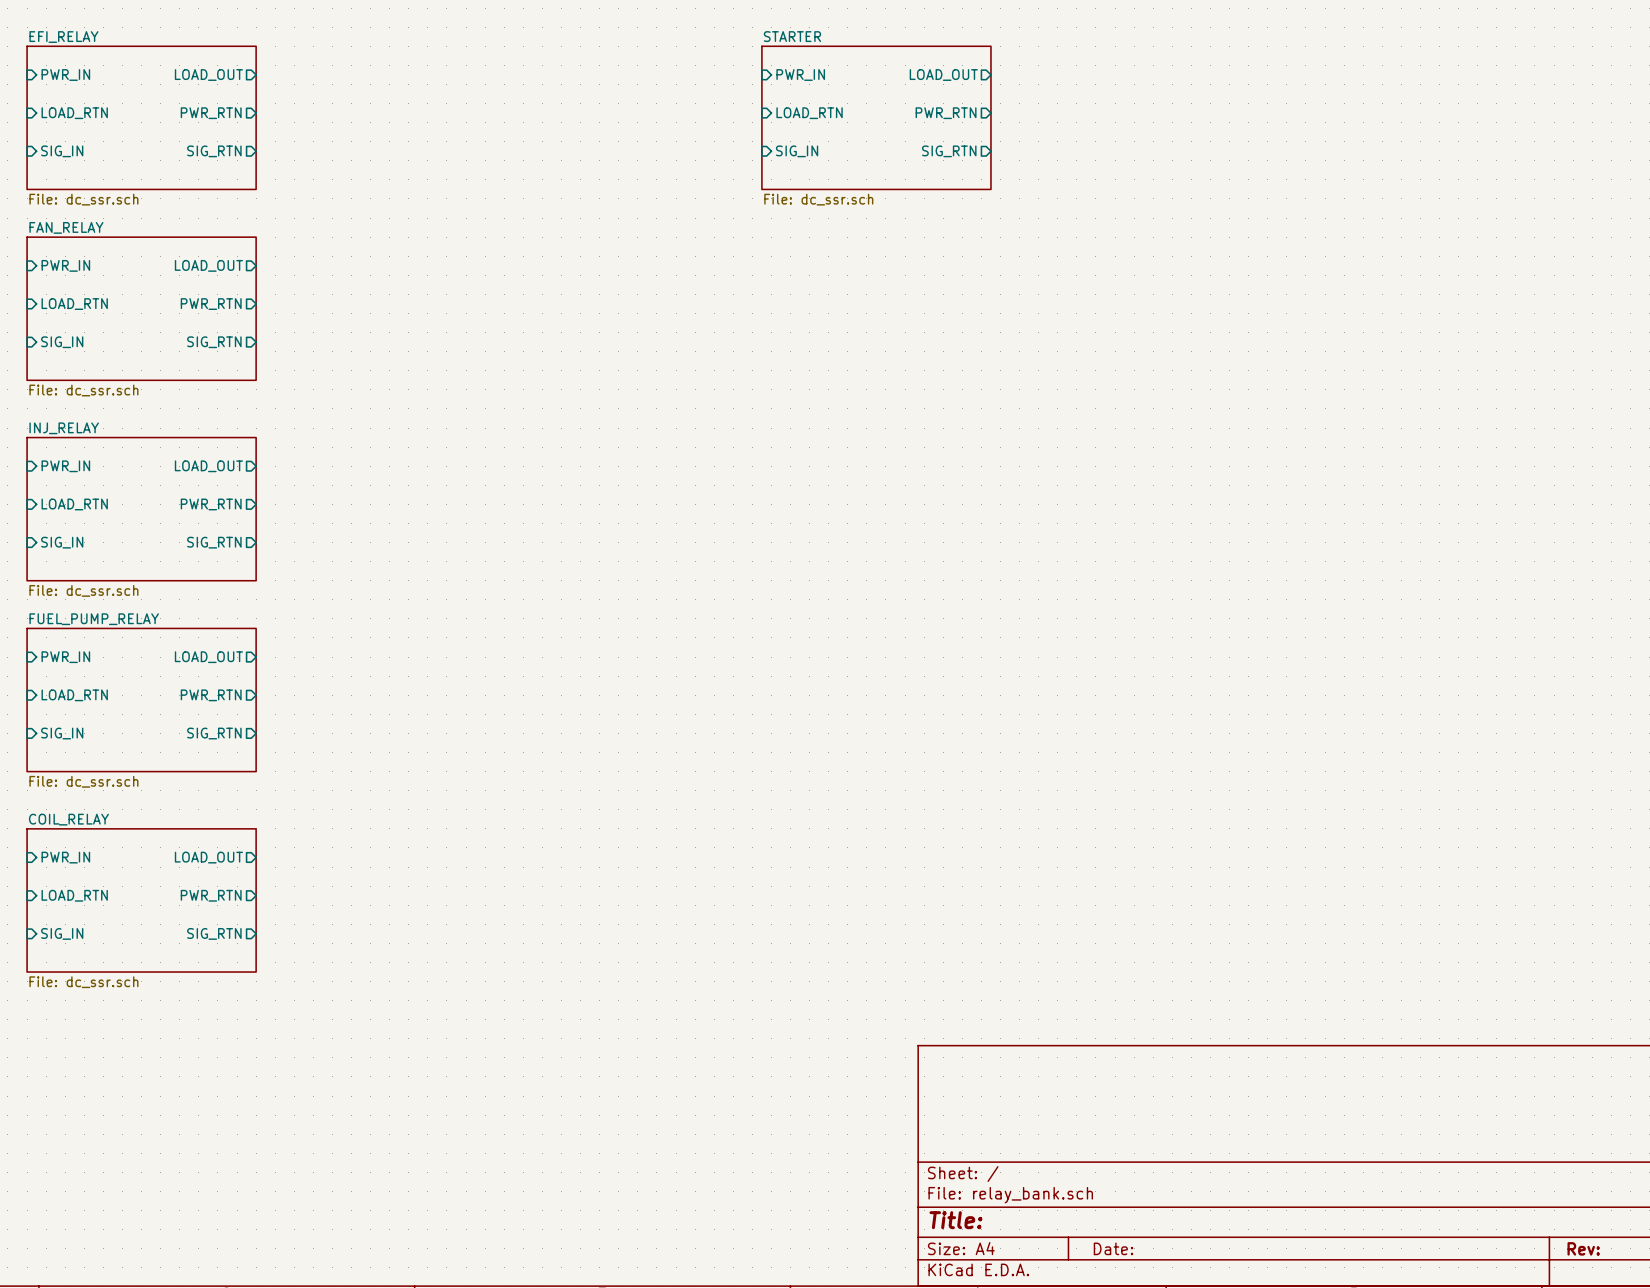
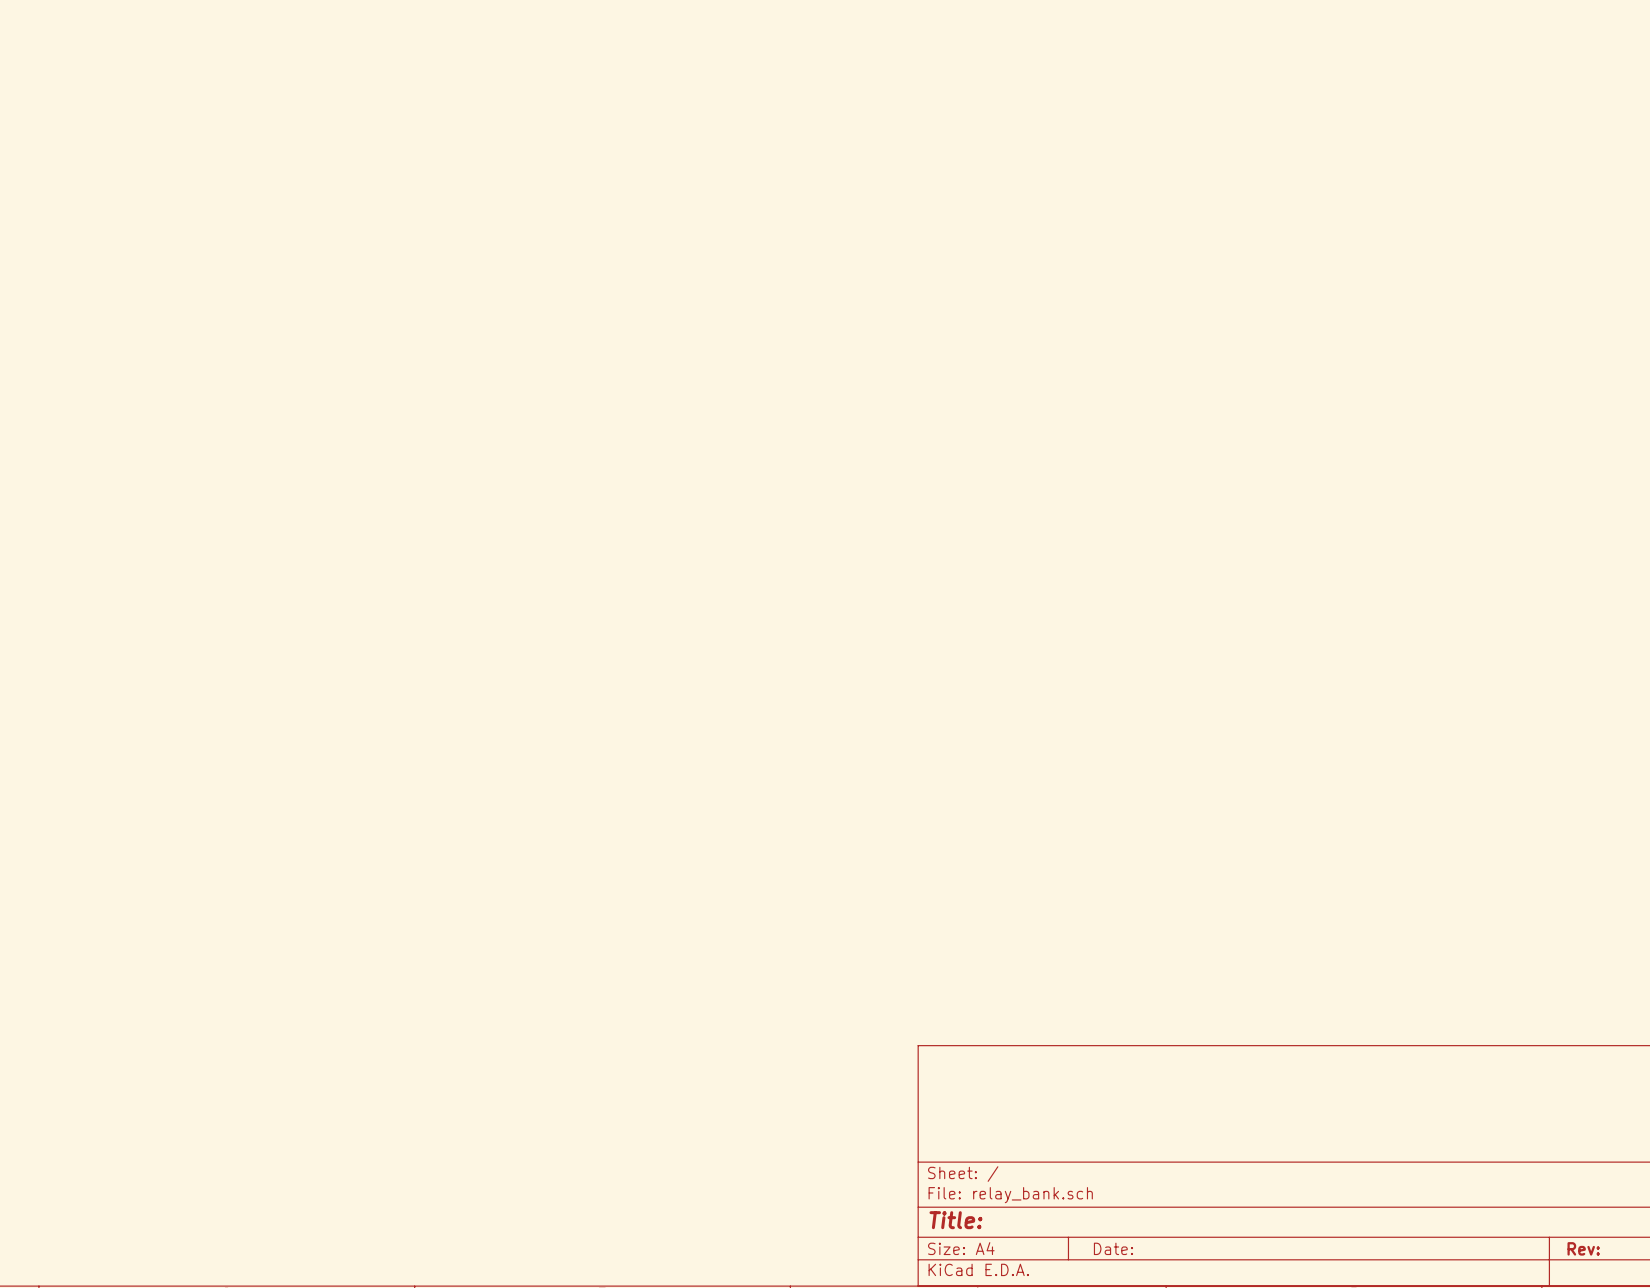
sheet pin: PWR_IN (65, 75) -> none
sheet pin: LOAD_OUT (208, 75) -> none
sheet pin: PWR_IN (800, 75) -> none
sheet pin: LOAD_OUT (943, 75) -> none
sheet pin: LOAD_RTN (74, 113) -> none
sheet pin: PWR_RTN (211, 113) -> none
sheet pin: LOAD_RTN (809, 113) -> none
sheet pin: PWR_RTN (946, 113) -> none
sheet EFI_RELAY: File: dc_ssr.sch (141, 117) -> none
sheet STARTER: File: dc_ssr.sch (876, 117) -> none
sheet pin: SIG_IN (62, 151) -> none
sheet pin: SIG_RTN (214, 151) -> none
sheet pin: SIG_IN (797, 151) -> none
sheet pin: SIG_RTN (949, 151) -> none
sheet pin: PWR_IN (65, 265) -> none
sheet pin: LOAD_OUT (208, 265) -> none
sheet pin: LOAD_RTN (74, 304) -> none
sheet pin: PWR_RTN (211, 304) -> none
sheet FAN_RELAY: File: dc_ssr.sch (141, 308) -> none
sheet pin: SIG_IN (62, 342) -> none
sheet pin: SIG_RTN (214, 342) -> none
sheet pin: PWR_IN (65, 466) -> none
sheet pin: LOAD_OUT (208, 466) -> none
sheet pin: LOAD_RTN (74, 504) -> none
sheet pin: PWR_RTN (211, 504) -> none
sheet INJ_RELAY: File: dc_ssr.sch (141, 509) -> none
sheet pin: SIG_IN (62, 542) -> none
sheet pin: SIG_RTN (214, 542) -> none
sheet pin: PWR_IN (65, 657) -> none
sheet pin: LOAD_OUT (208, 657) -> none
sheet pin: LOAD_RTN (74, 695) -> none
sheet pin: PWR_RTN (211, 695) -> none
sheet FUEL_PUMP_RELAY: File: dc_ssr.sch (141, 700) -> none
sheet pin: SIG_IN (62, 733) -> none
sheet pin: SIG_RTN (214, 733) -> none
sheet pin: PWR_IN (65, 857) -> none
sheet pin: LOAD_OUT (208, 857) -> none
sheet pin: LOAD_RTN (74, 895) -> none
sheet pin: PWR_RTN (211, 895) -> none
sheet COIL_RELAY: File: dc_ssr.sch (141, 900) -> none
sheet pin: SIG_IN (62, 933) -> none
sheet pin: SIG_RTN (214, 933) -> none

